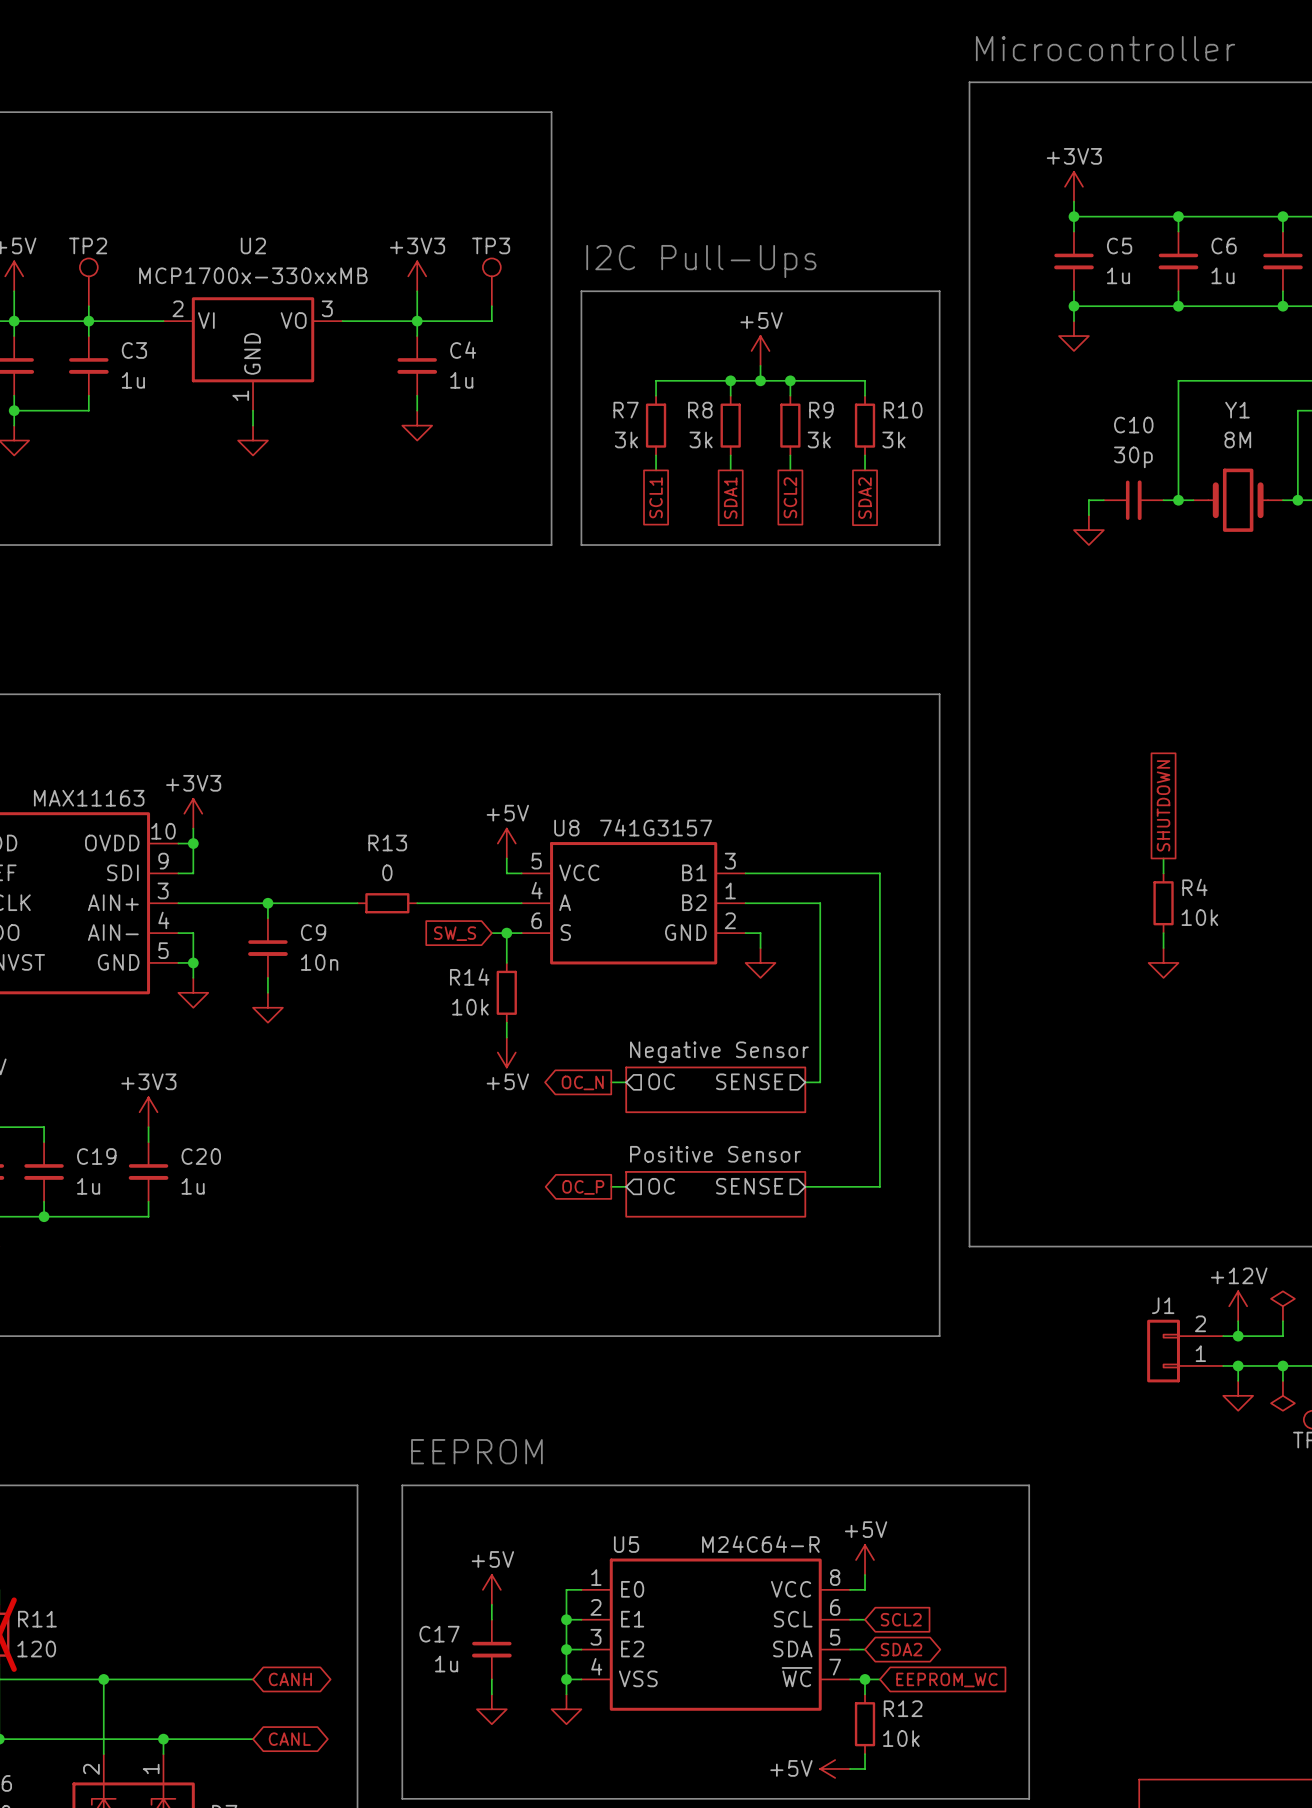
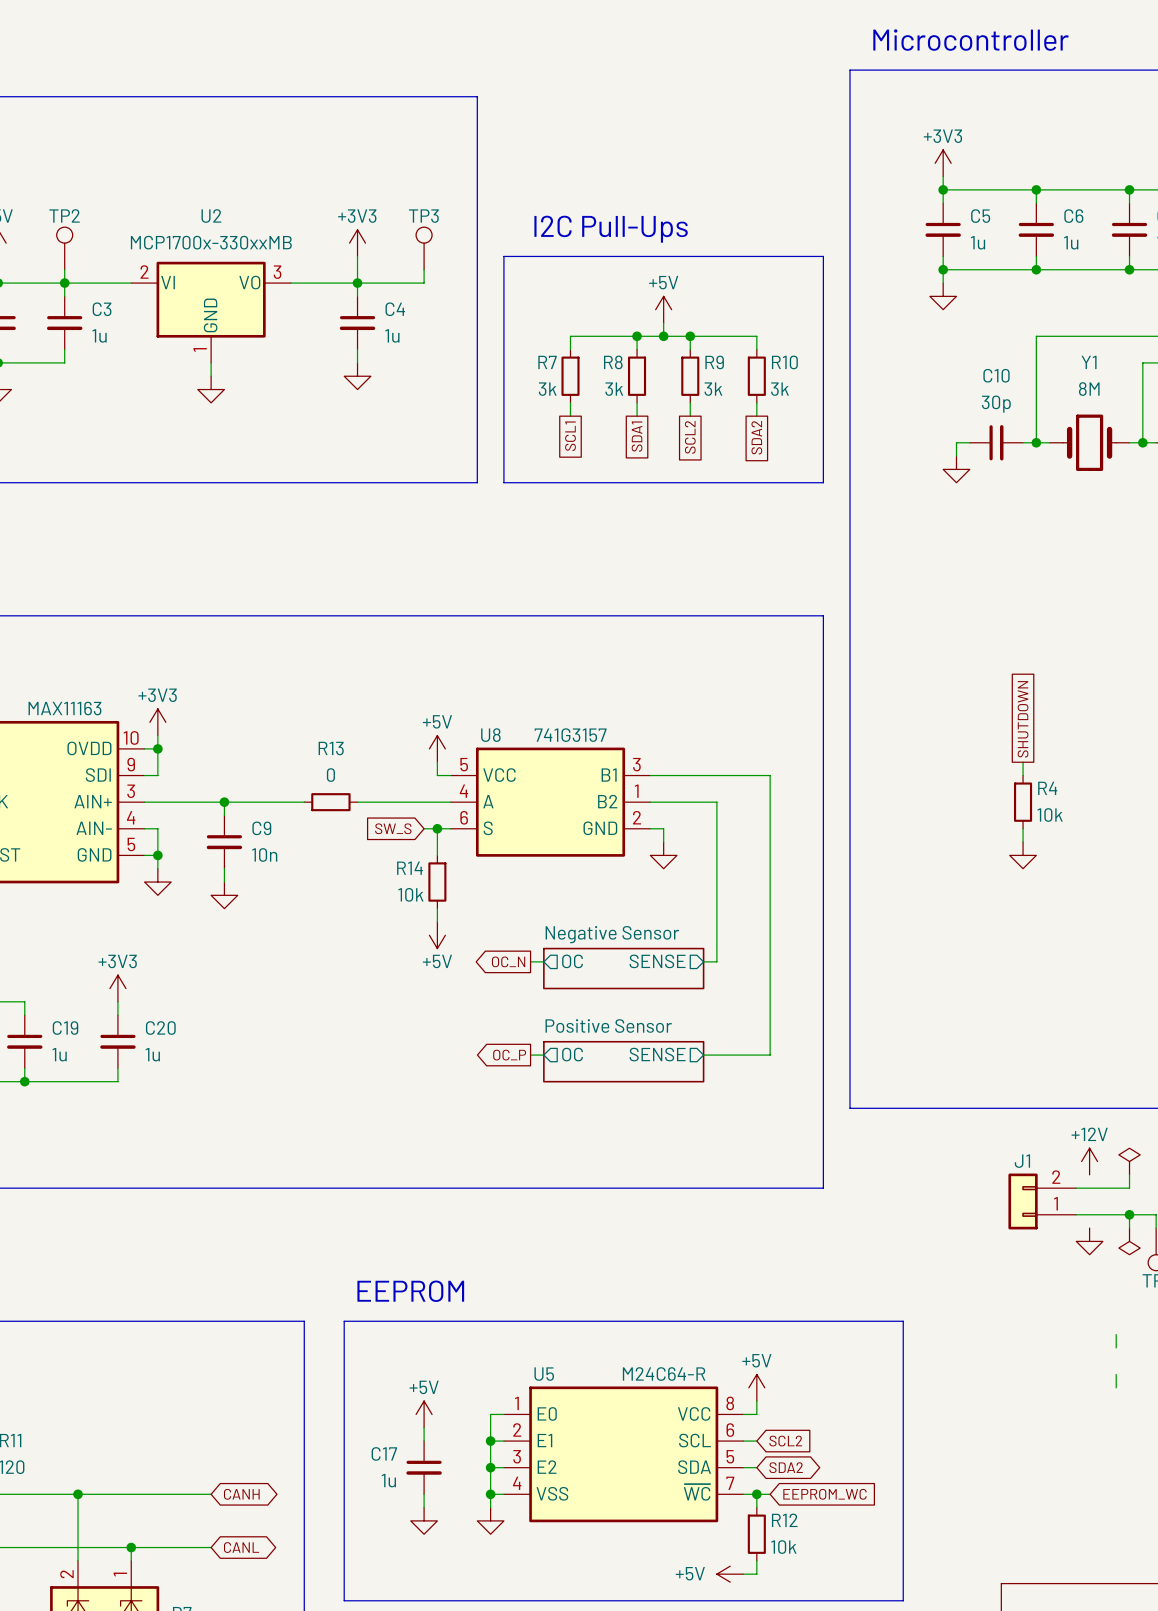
wire: (1238, 1321) (1238, 1336) -> (1116, 1334) (1116, 1347)
junction: (1238, 1336) -> none
wire: (1238, 1365) (1238, 1380) -> (1116, 1374) (1116, 1387)
junction: (1238, 1365) -> none

